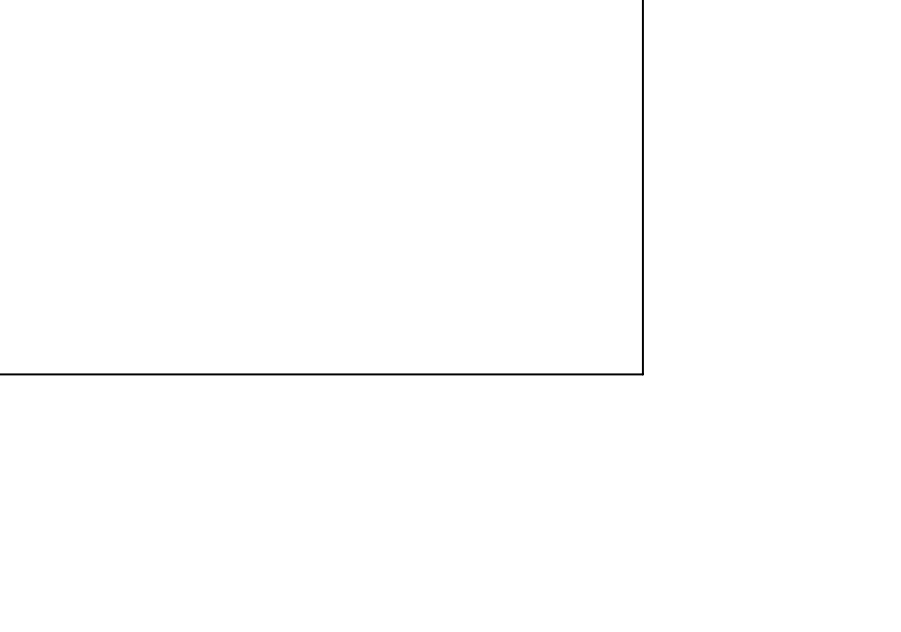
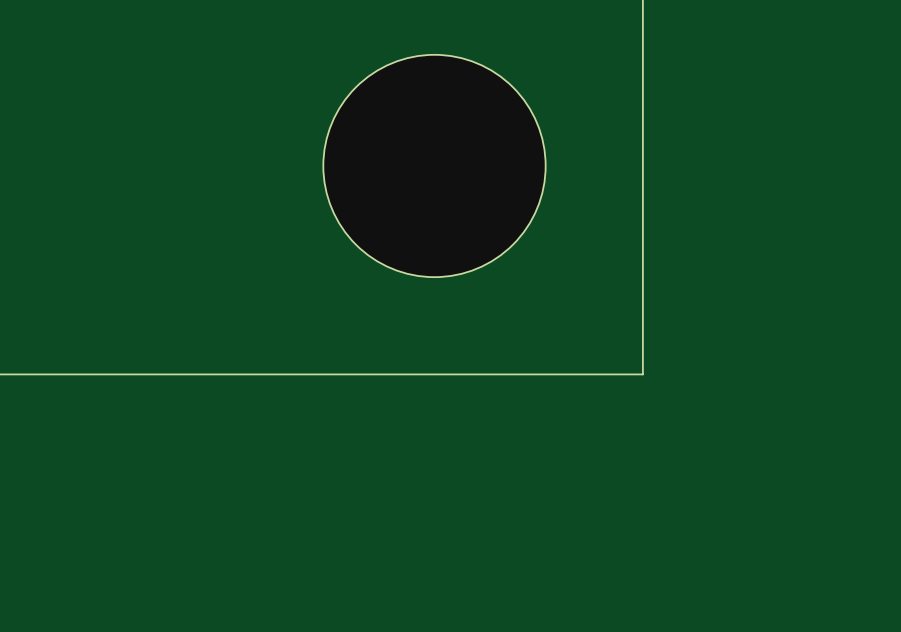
part: none -> (434, 165)

